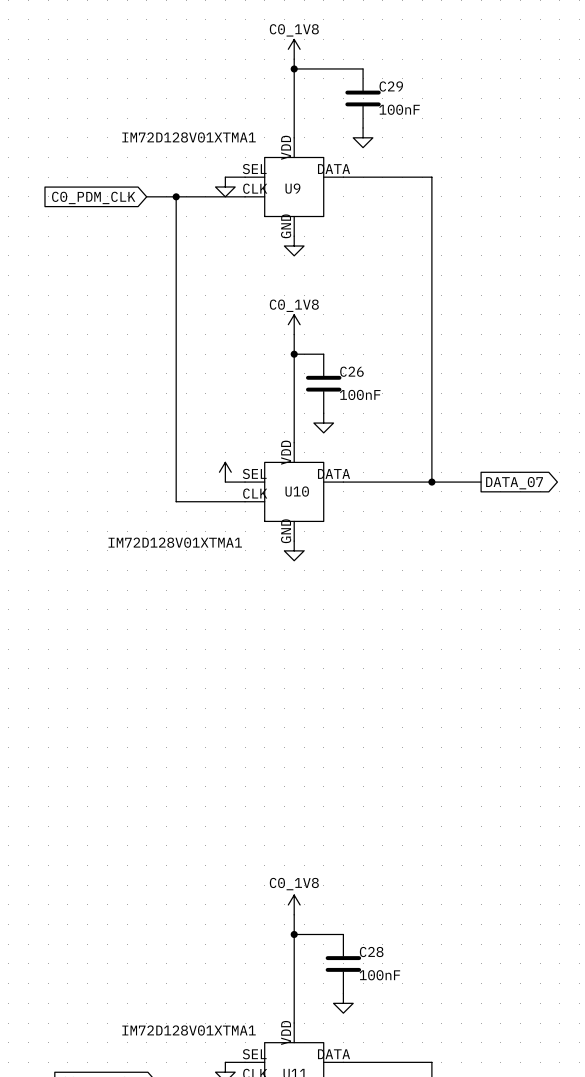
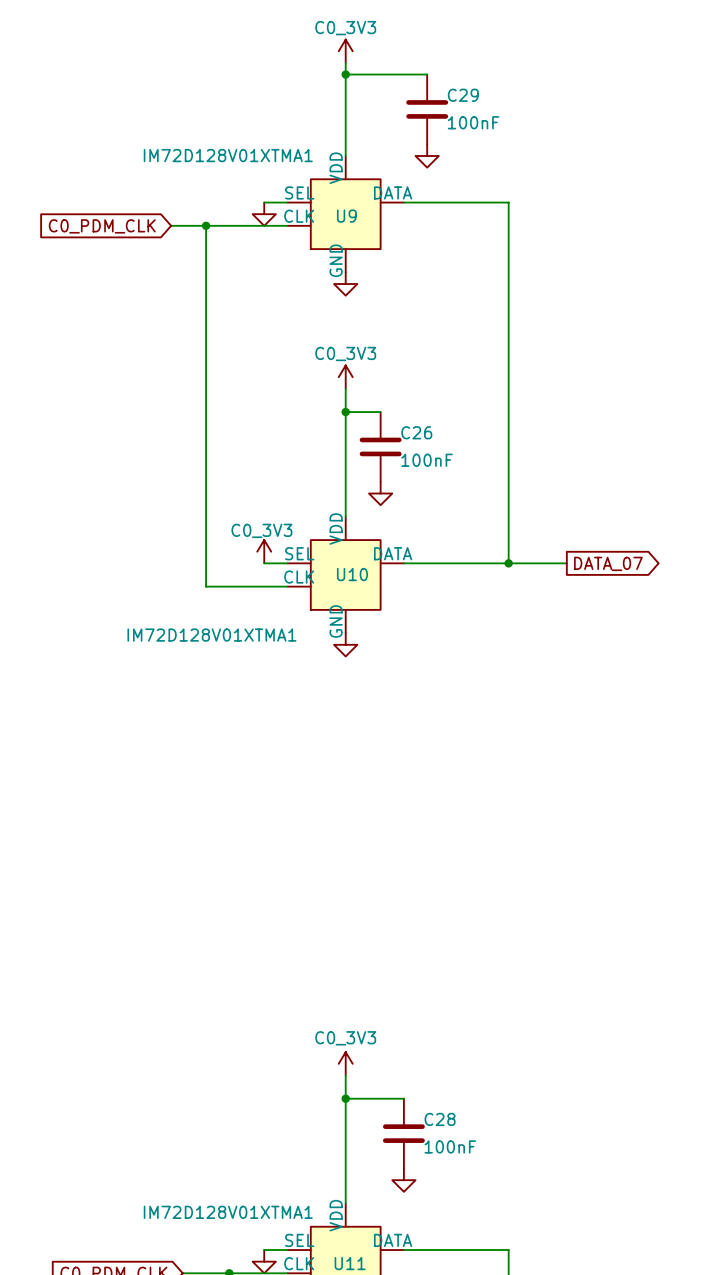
power symbol: C0_1V8 (294, 49) -> C0_3V3 (345, 51)
power symbol: C0_1V8 (294, 324) -> C0_3V3 (345, 377)
power symbol text: none -> C0_3V3 (261, 530)
power symbol: C0_1V8 (294, 904) -> C0_3V3 (345, 1063)

